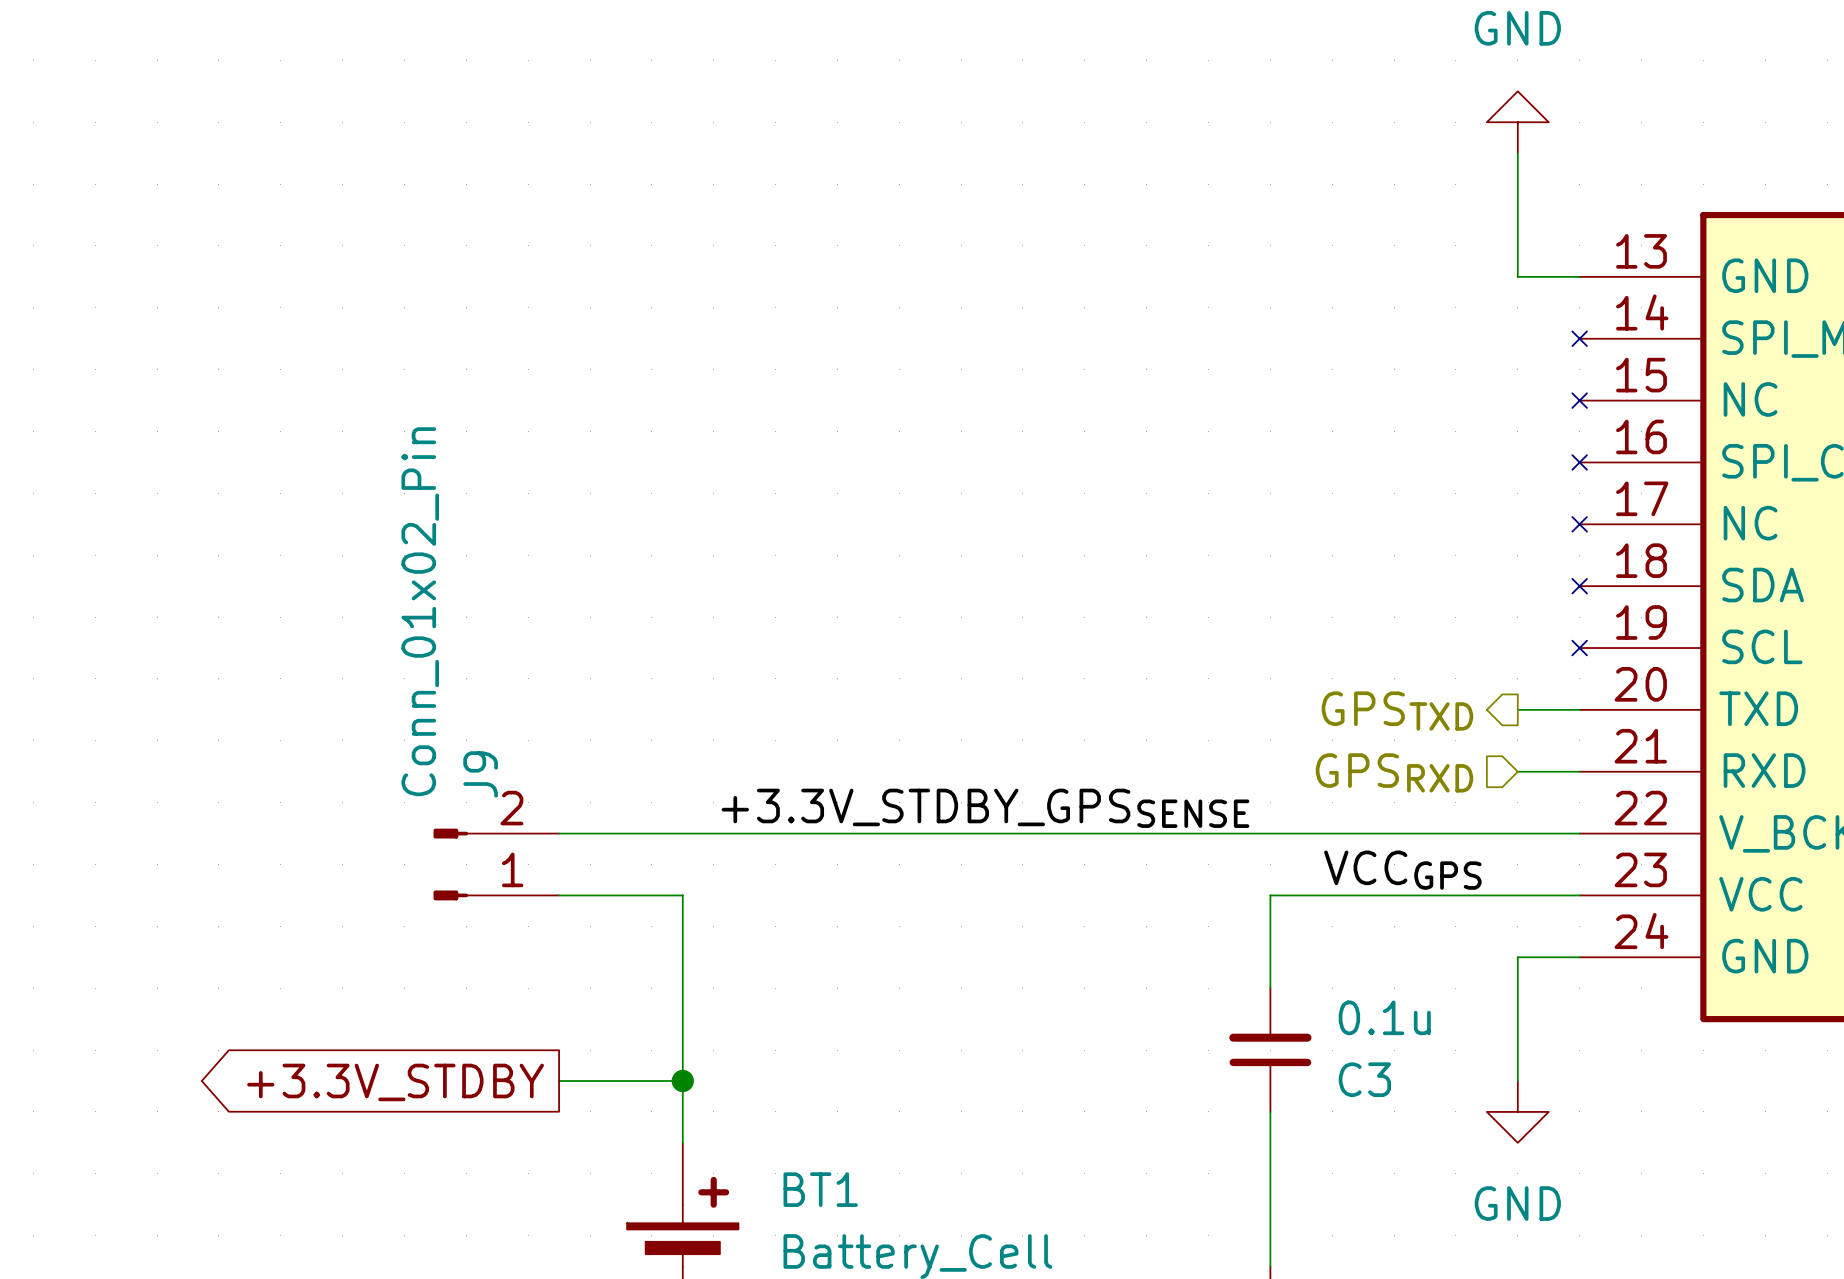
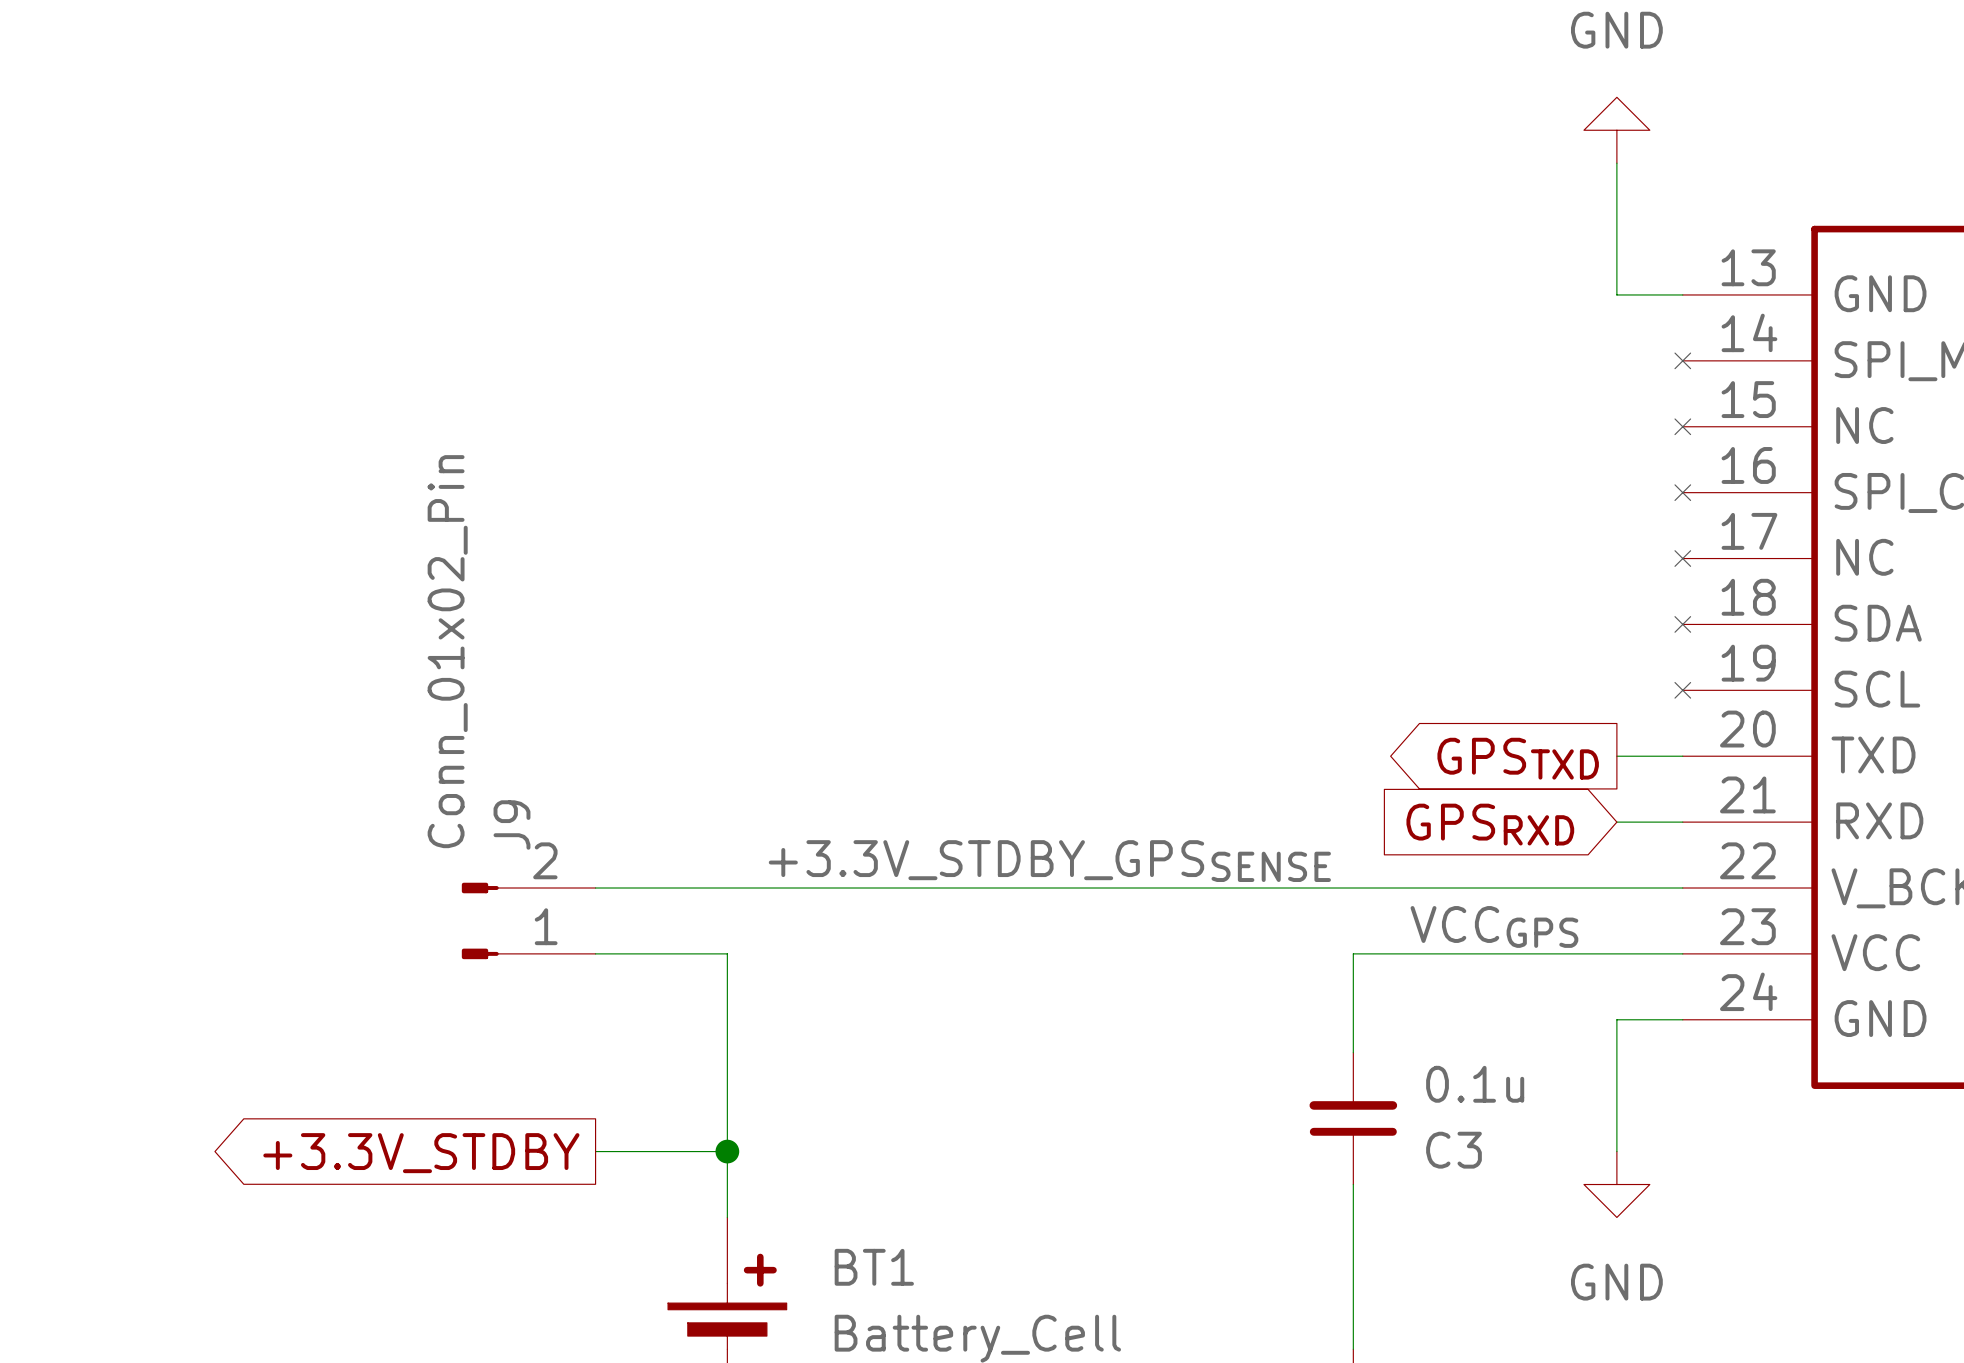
hierarchical label: GPSTXD (1397, 711) -> none
global label: none -> GPSTXD (1518, 758)
hierarchical label: GPSRXD (1394, 772) -> none
global label: none -> GPSRXD (1490, 824)

